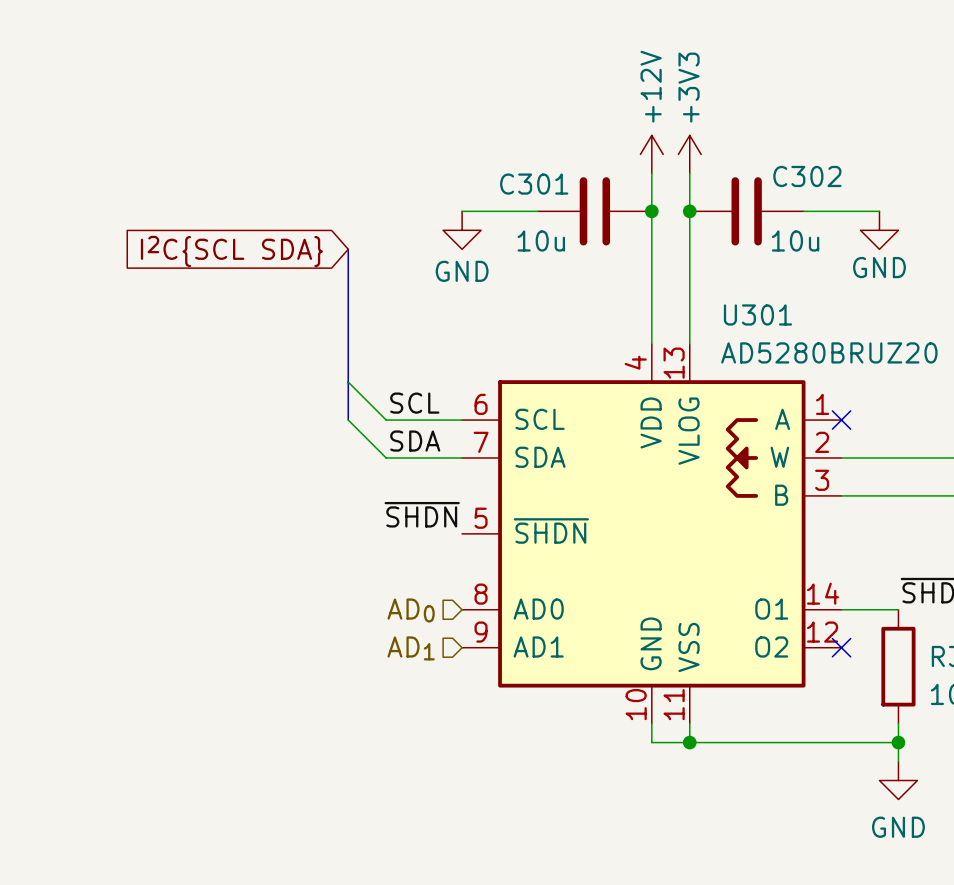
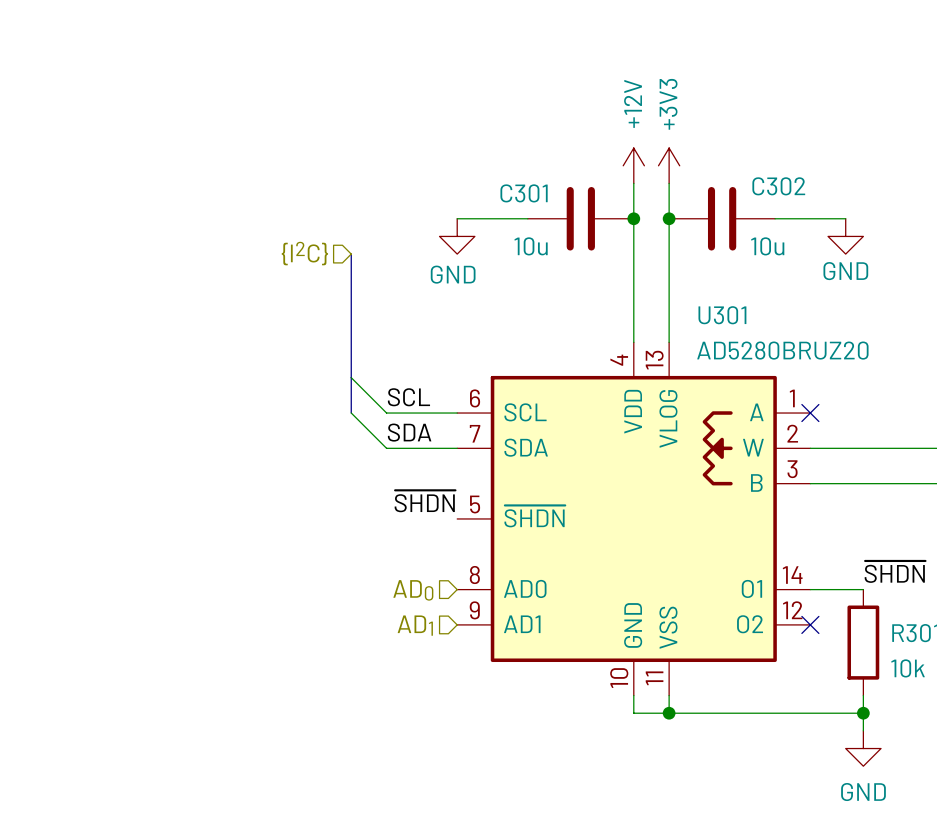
hierarchical label: none -> {I2C} (304, 253)
global label: I2C{SCL SDA} (231, 251) -> none

